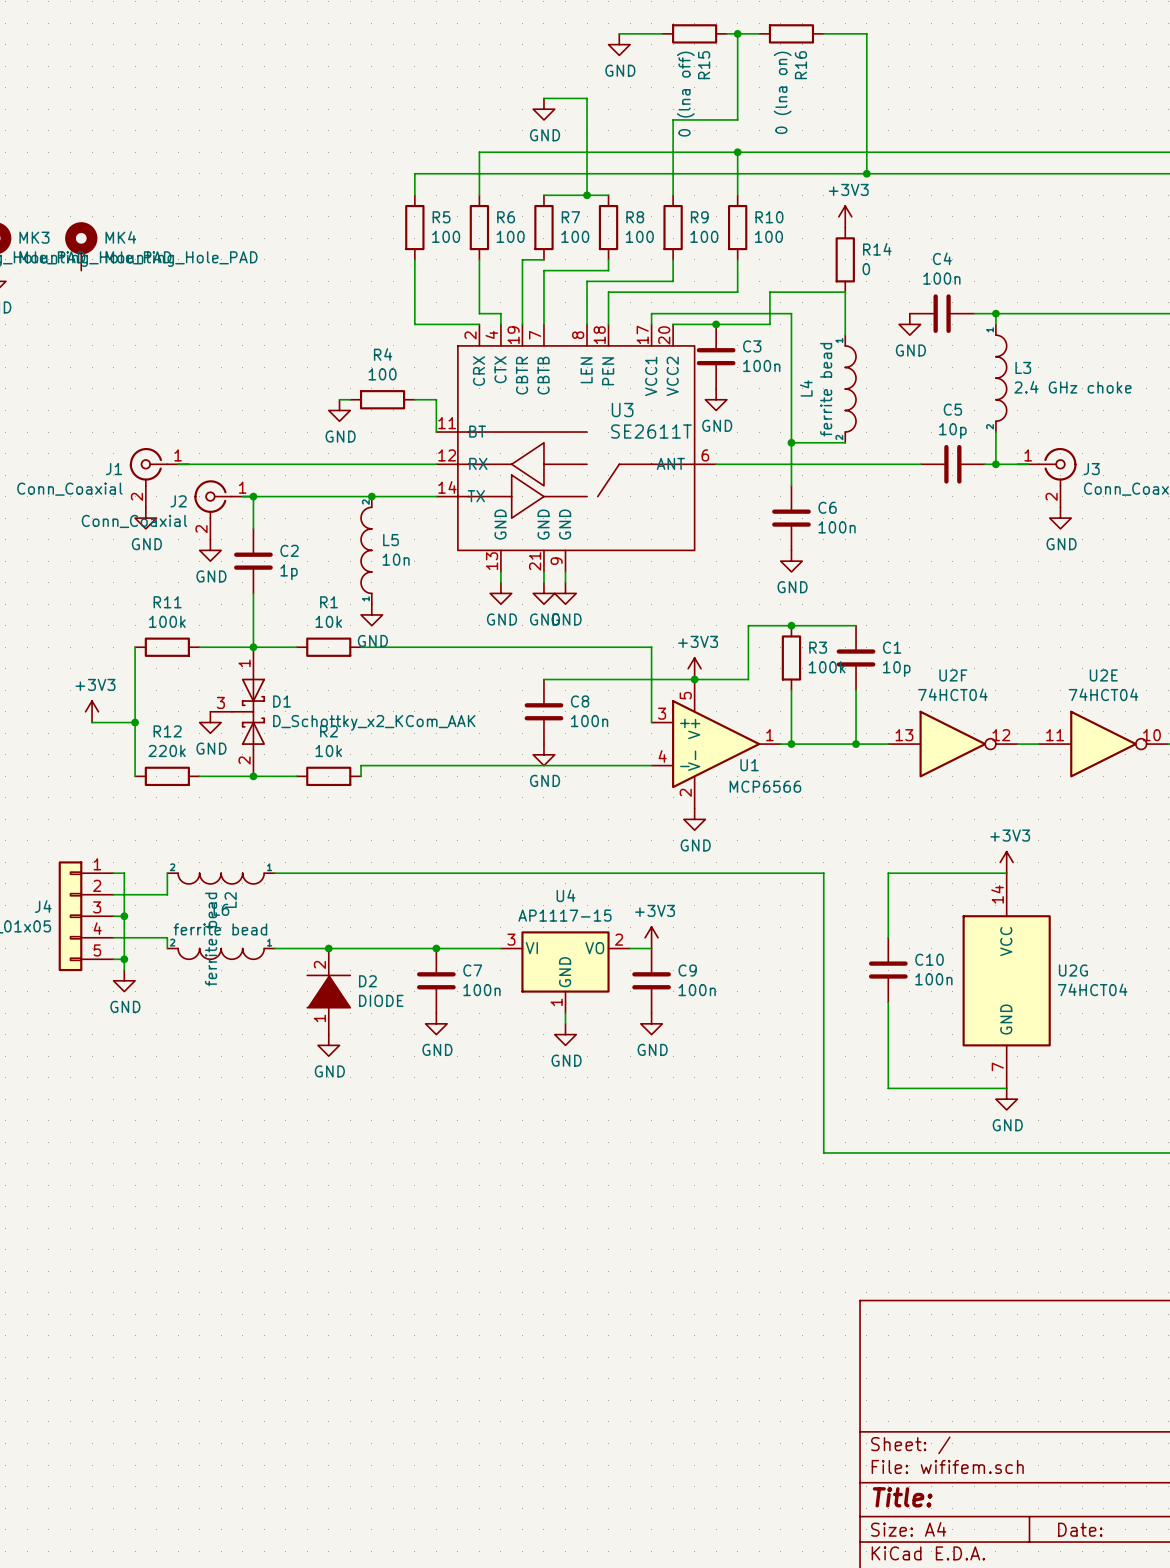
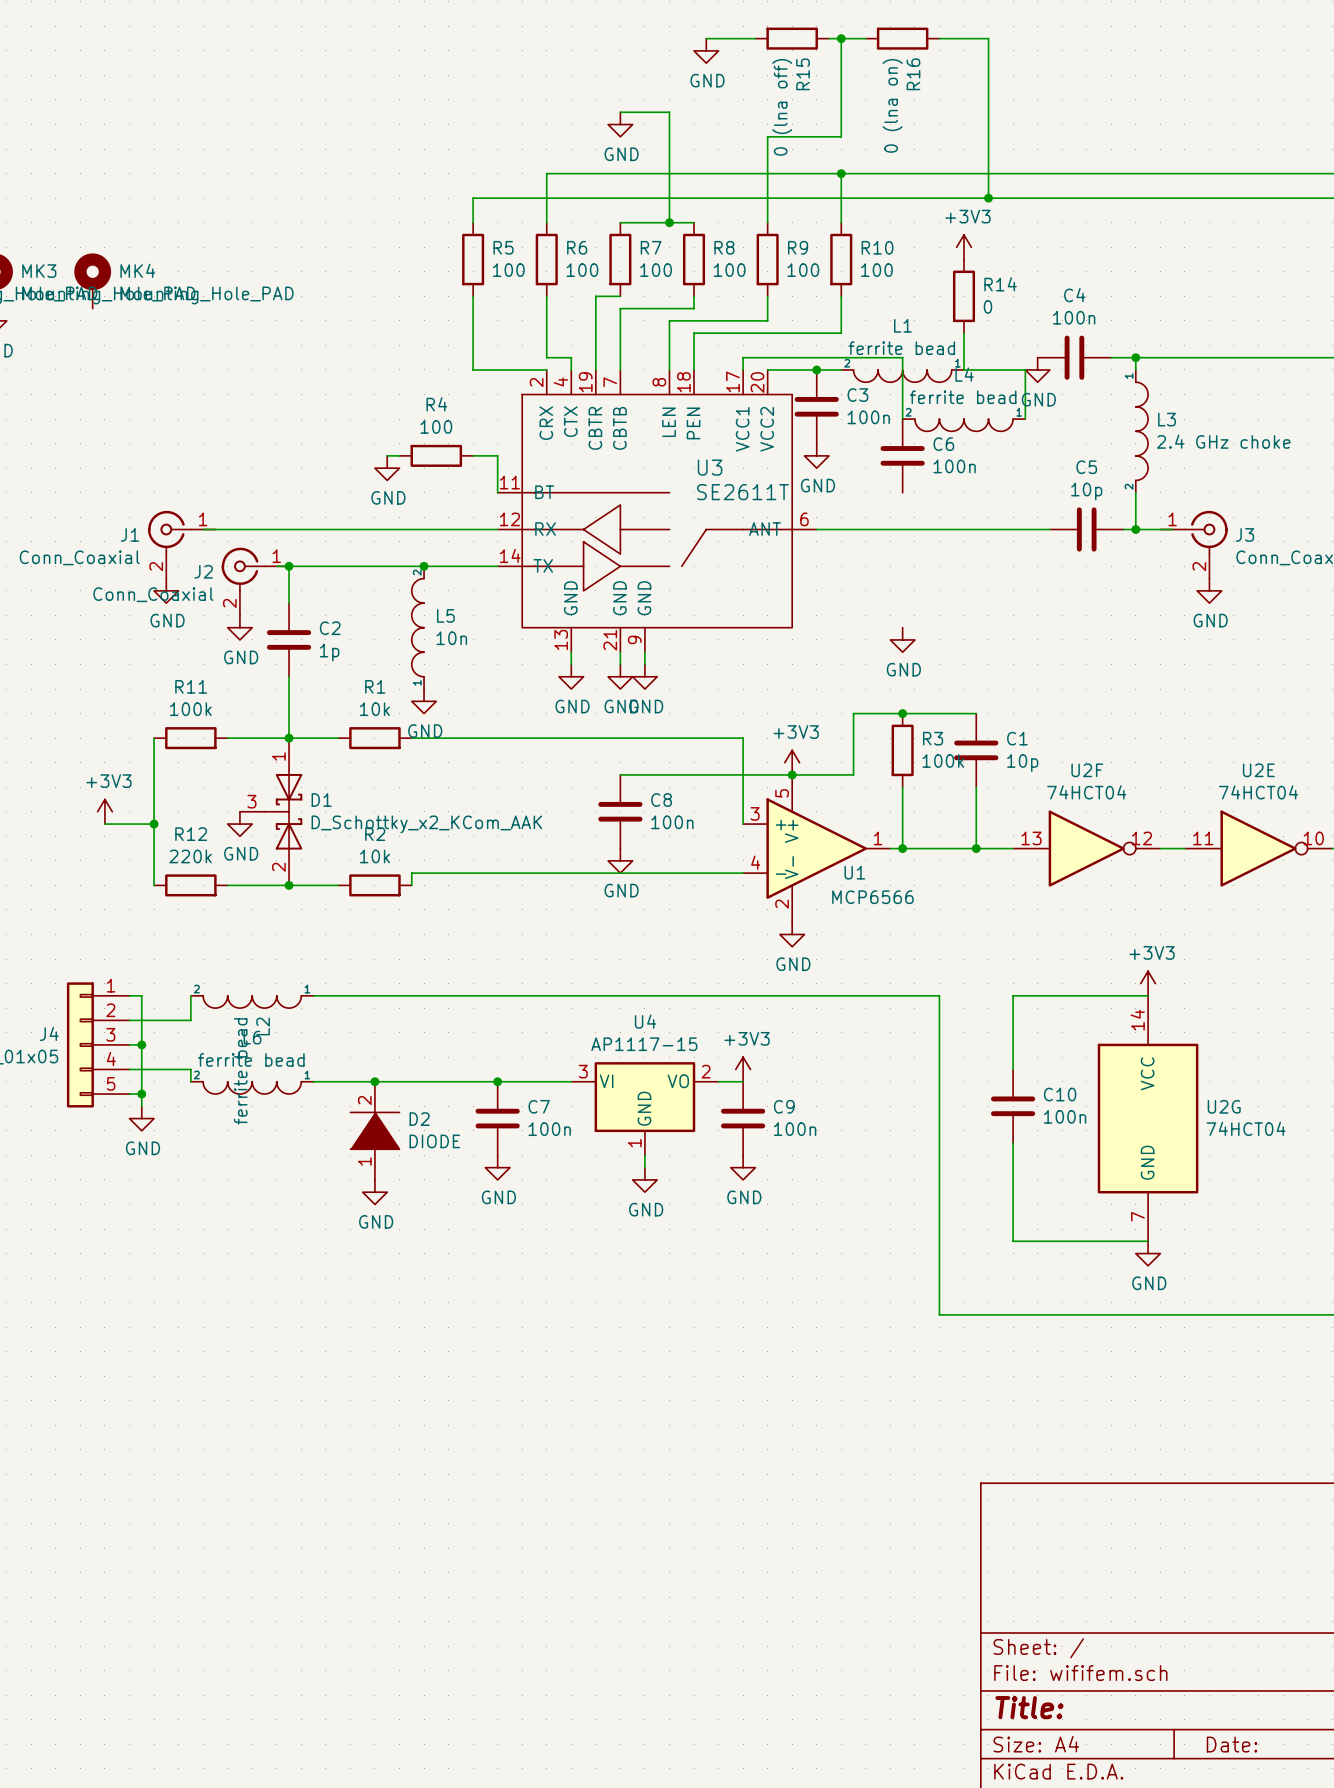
wire: (845, 292) (769, 292) (769, 324) (737, 324) -> none
wire: (845, 324) (845, 335) -> (963, 369) (1025, 369) (1025, 419)
L1: none -> ferrite bead (902, 376)
wire: (791, 367) (791, 485) -> none
L4 rotation: 0° (850, 388) -> 90° clockwise (963, 425)
wire: (791, 442) (845, 442) -> none
junction: (791, 442) -> none
C6 position: (791, 518) -> (902, 455)

